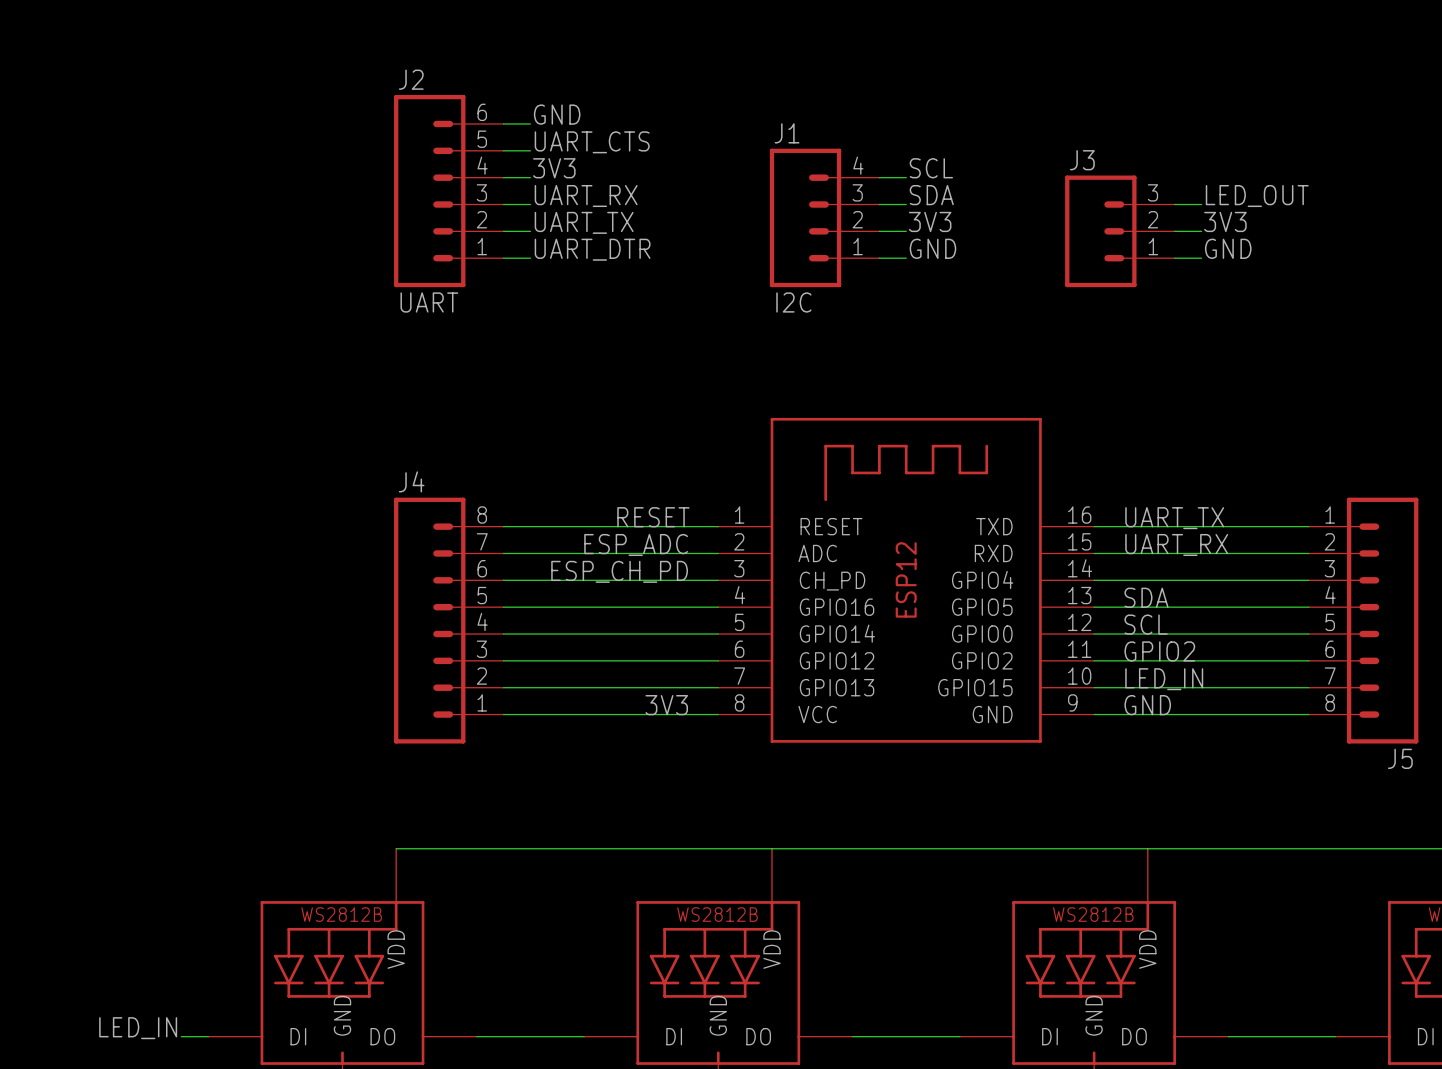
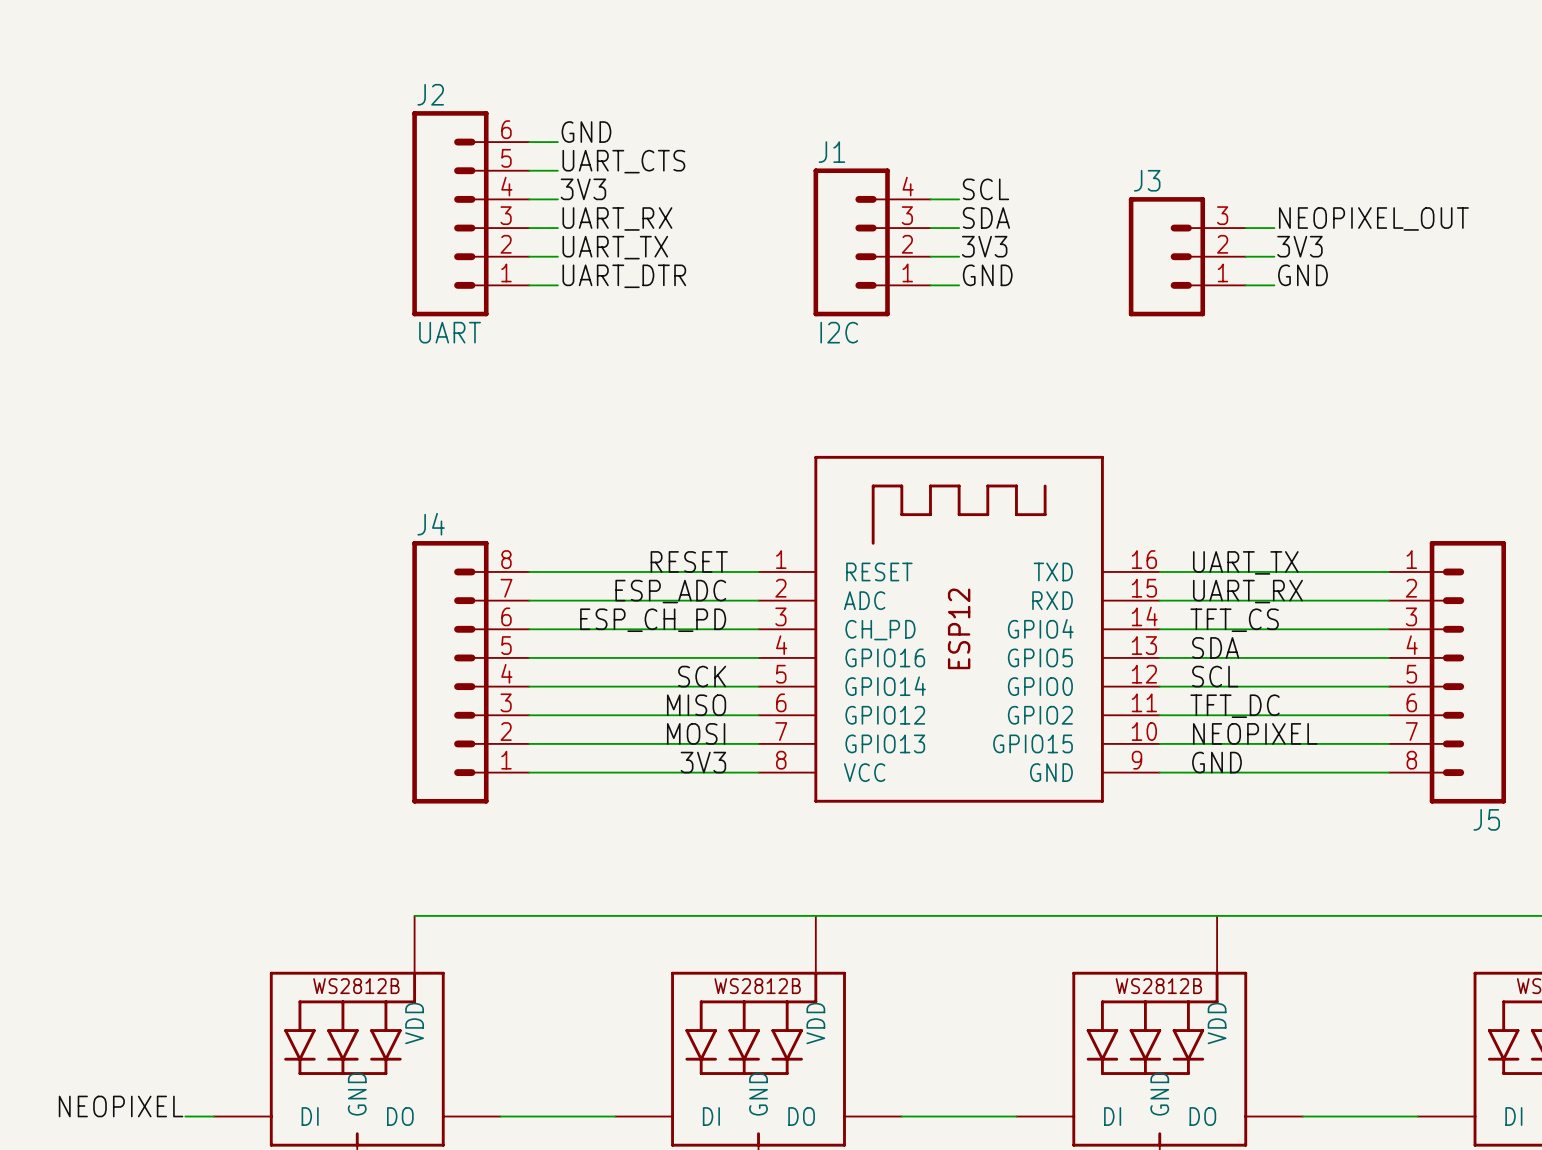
label: LED_OUT (1257, 196) -> NEOPIXEL_OUT (1373, 218)
label: none -> TFT_CS (1234, 620)
label: none -> SCK (702, 676)
label: none -> MISO (696, 705)
label: GPIO2 (1159, 651) -> TFT_DC (1235, 706)
label: none -> MOSI (696, 733)
label: LED_IN (1164, 679) -> NEOPIXEL (1255, 733)
label: LED_IN (138, 1028) -> NEOPIXEL (121, 1106)

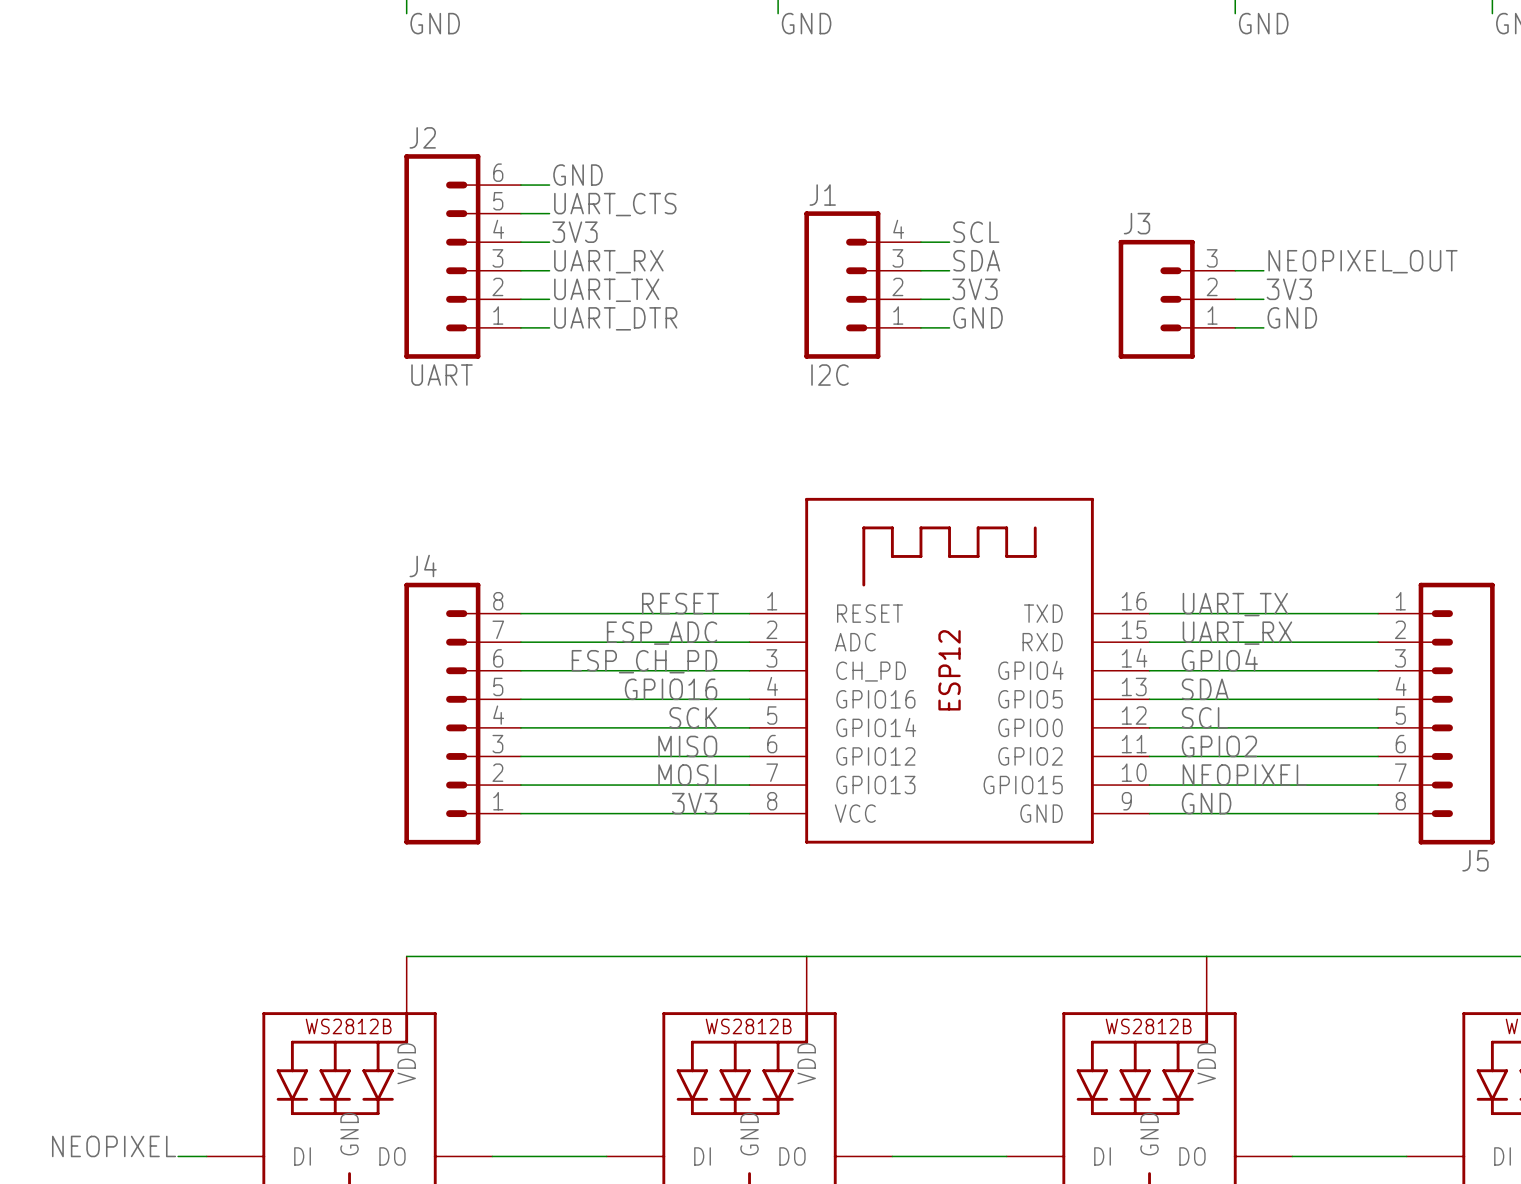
label: TFT_CS (1234, 620) -> GPIO4 (1219, 660)
label: none -> GPIO16 (671, 689)
label: TFT_DC (1235, 706) -> GPIO2 (1219, 746)

